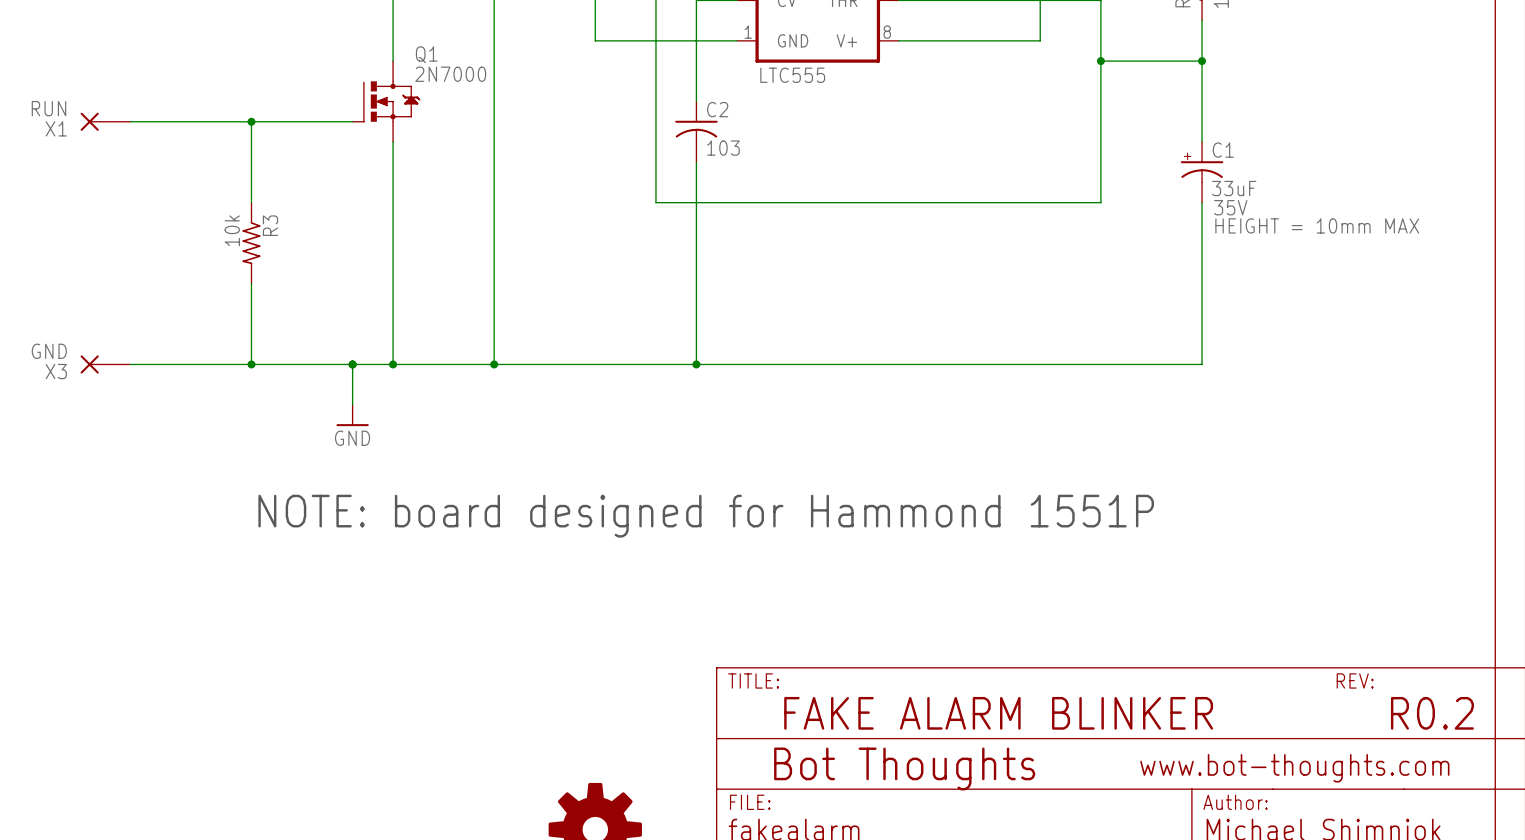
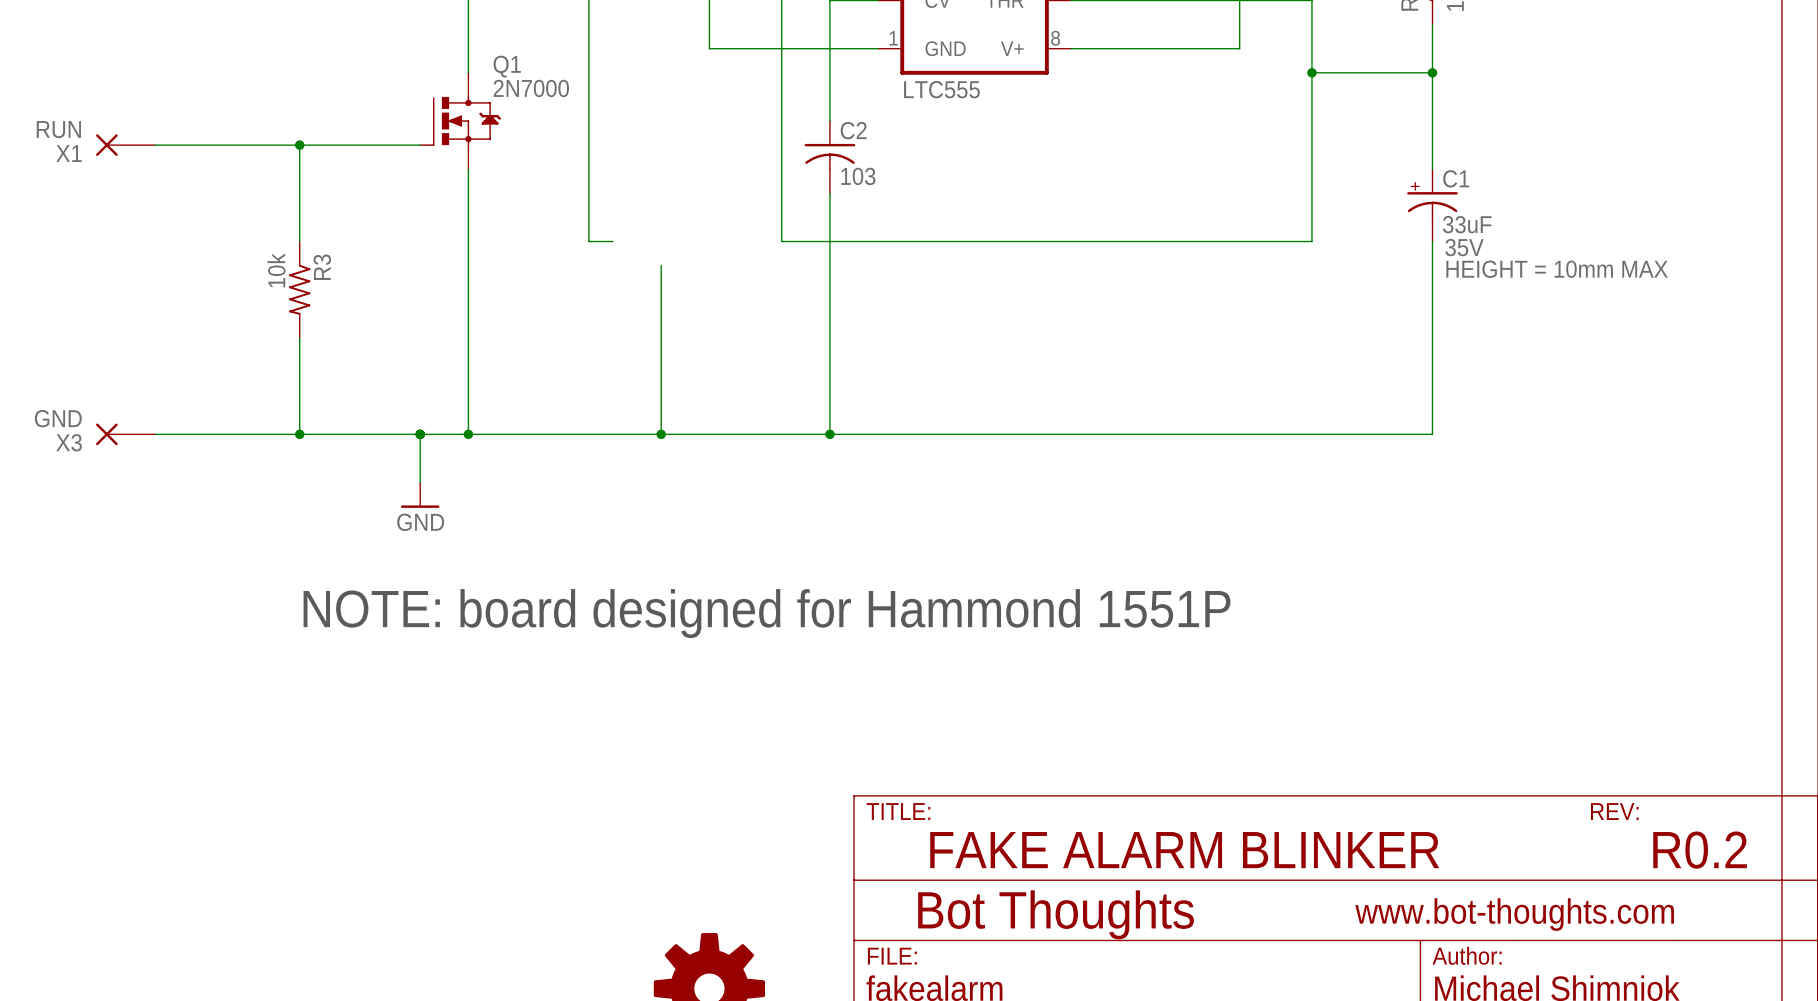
wire: (494, 202) (494, 364) -> (588, 241) (613, 241)
wire: none -> (661, 265) (661, 434)
junction: (494, 364) -> none
junction: none -> (661, 434)

